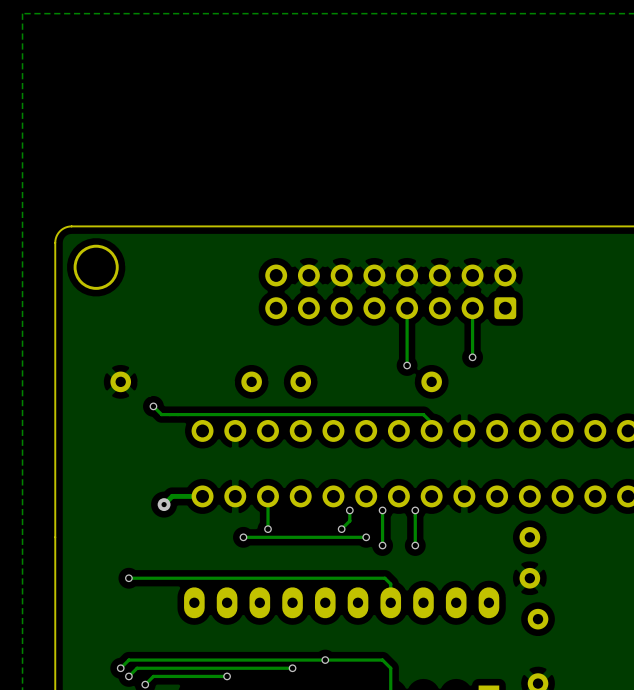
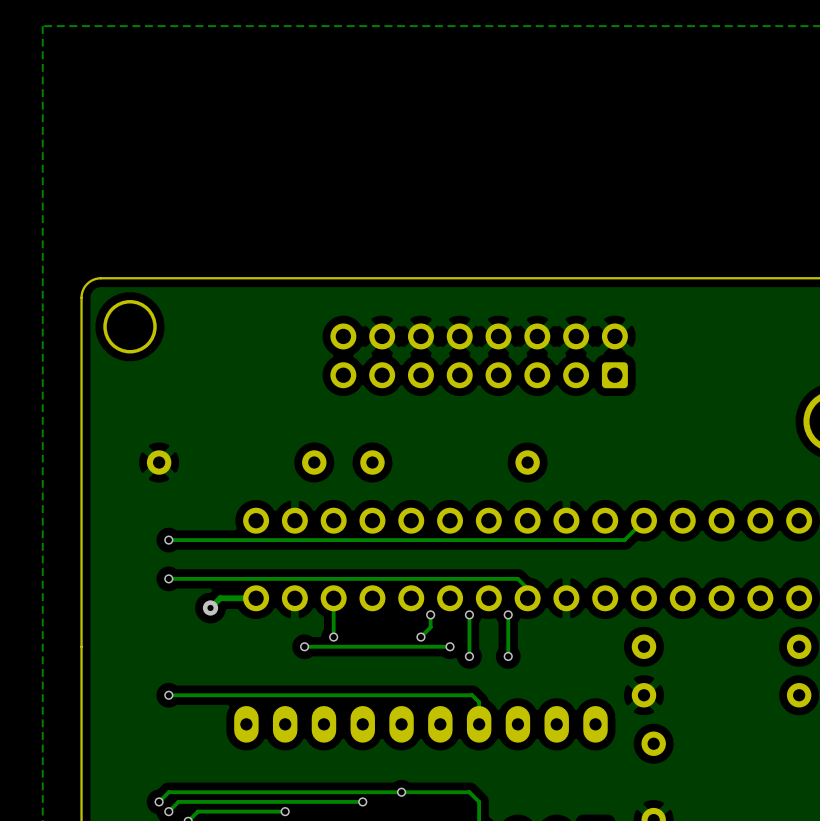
track: (407, 308) (407, 365) -> none
track: (472, 308) (472, 357) -> none
via: (472, 357) -> none
via: (407, 365) -> none
track: (153, 406) (161, 414) (423, 414) (431, 422) (431, 430) -> none
via: (153, 406) -> none
track: none -> (643, 520) (624, 540) (168, 540)
via: none -> (168, 540)
track: none -> (168, 578) (517, 578) (527, 588) (527, 598)
via: none -> (168, 578)

